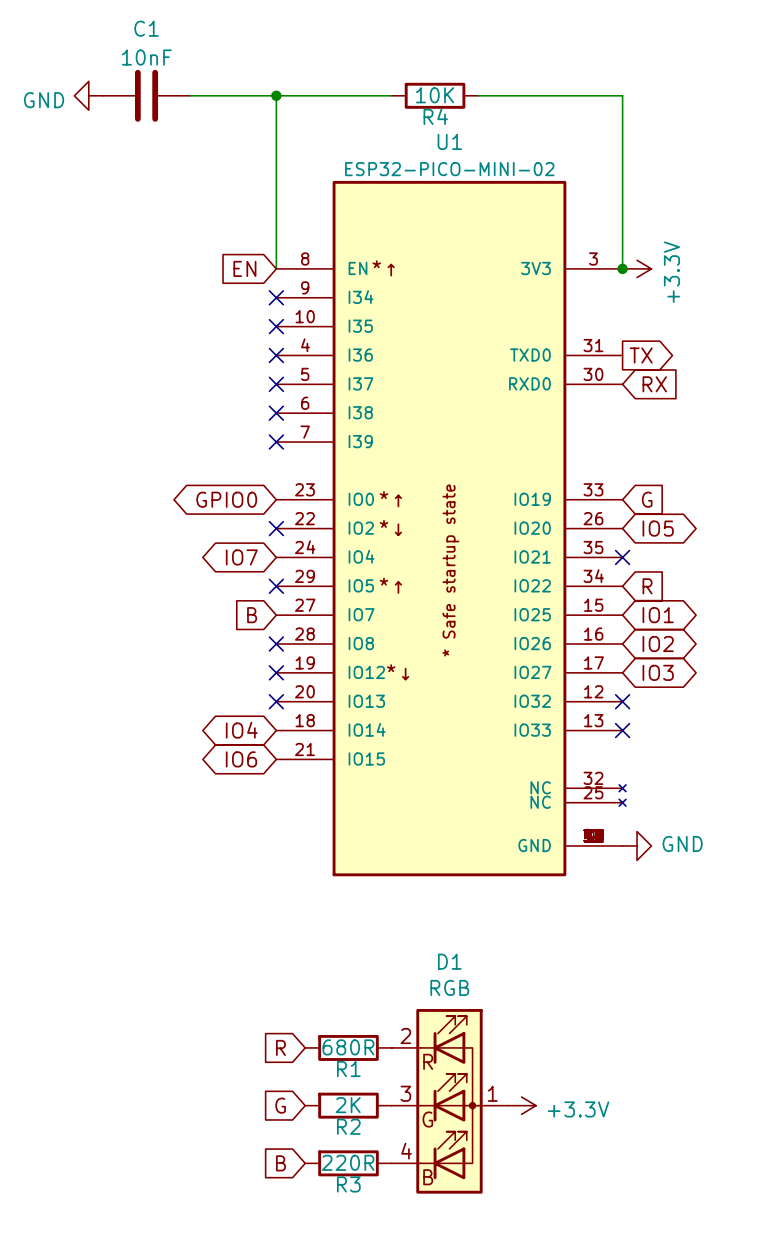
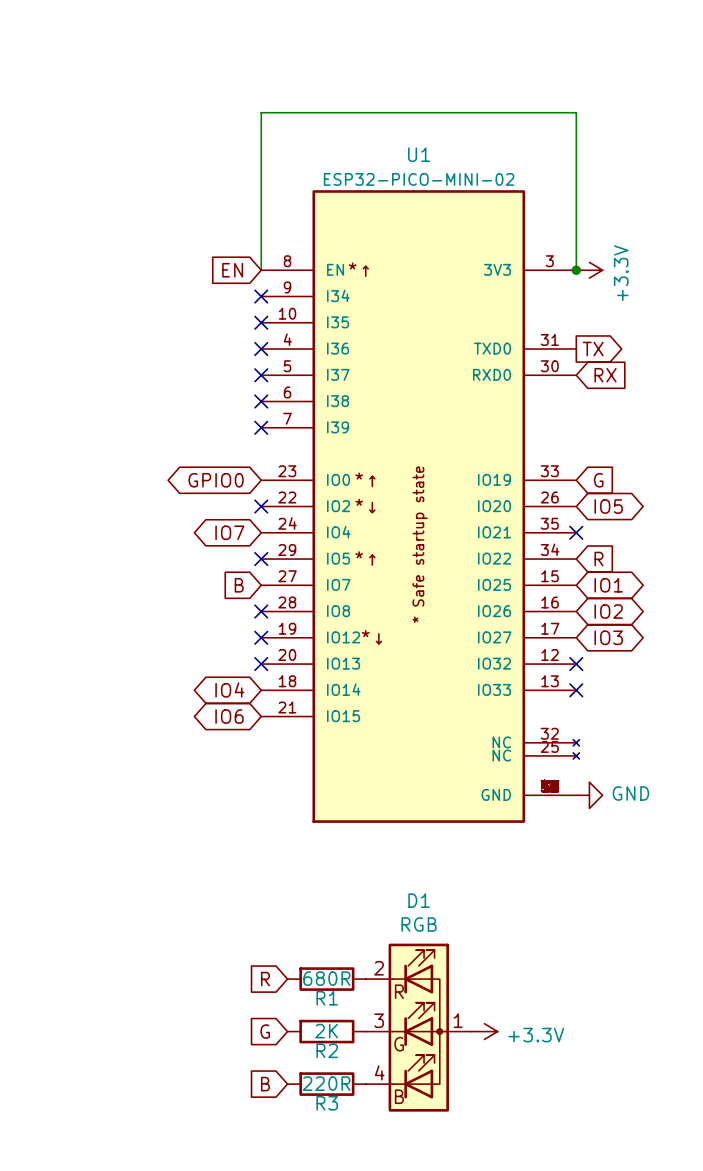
power symbol: GND (88, 95) -> none
C1: 10nF (146, 95) -> none
wire: (189, 95) (276, 95) -> (366, 112) (445, 112)
junction: (276, 95) -> none
R4: 10K (435, 95) -> none

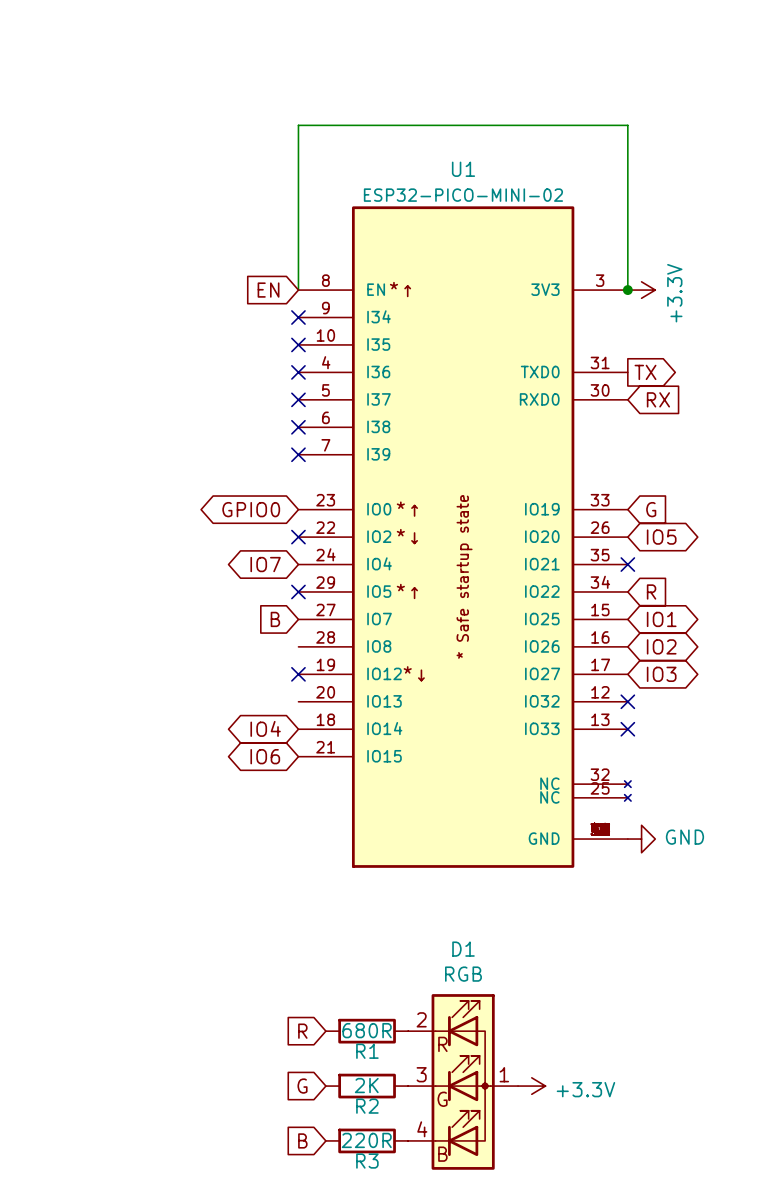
no-connect mark: (261, 611) -> none
no-connect mark: (261, 664) -> none

